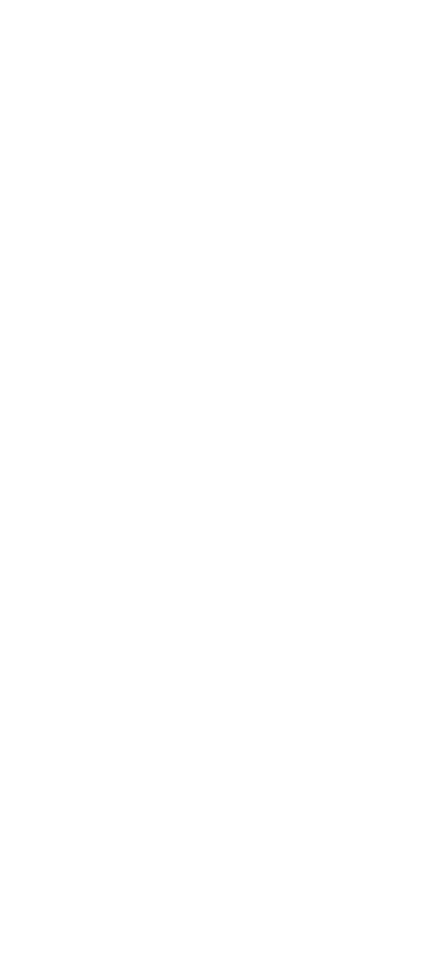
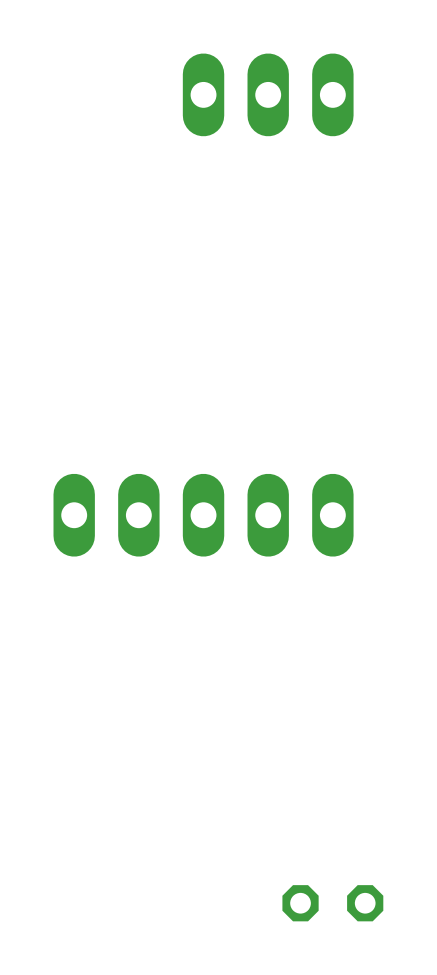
part: none -> (268, 94)
part: none -> (203, 515)
part: none -> (332, 903)

